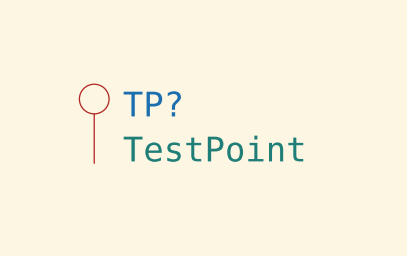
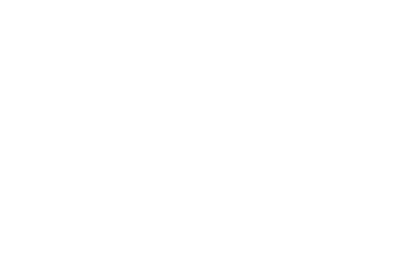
TP?: TestPoint (94, 123) -> none

